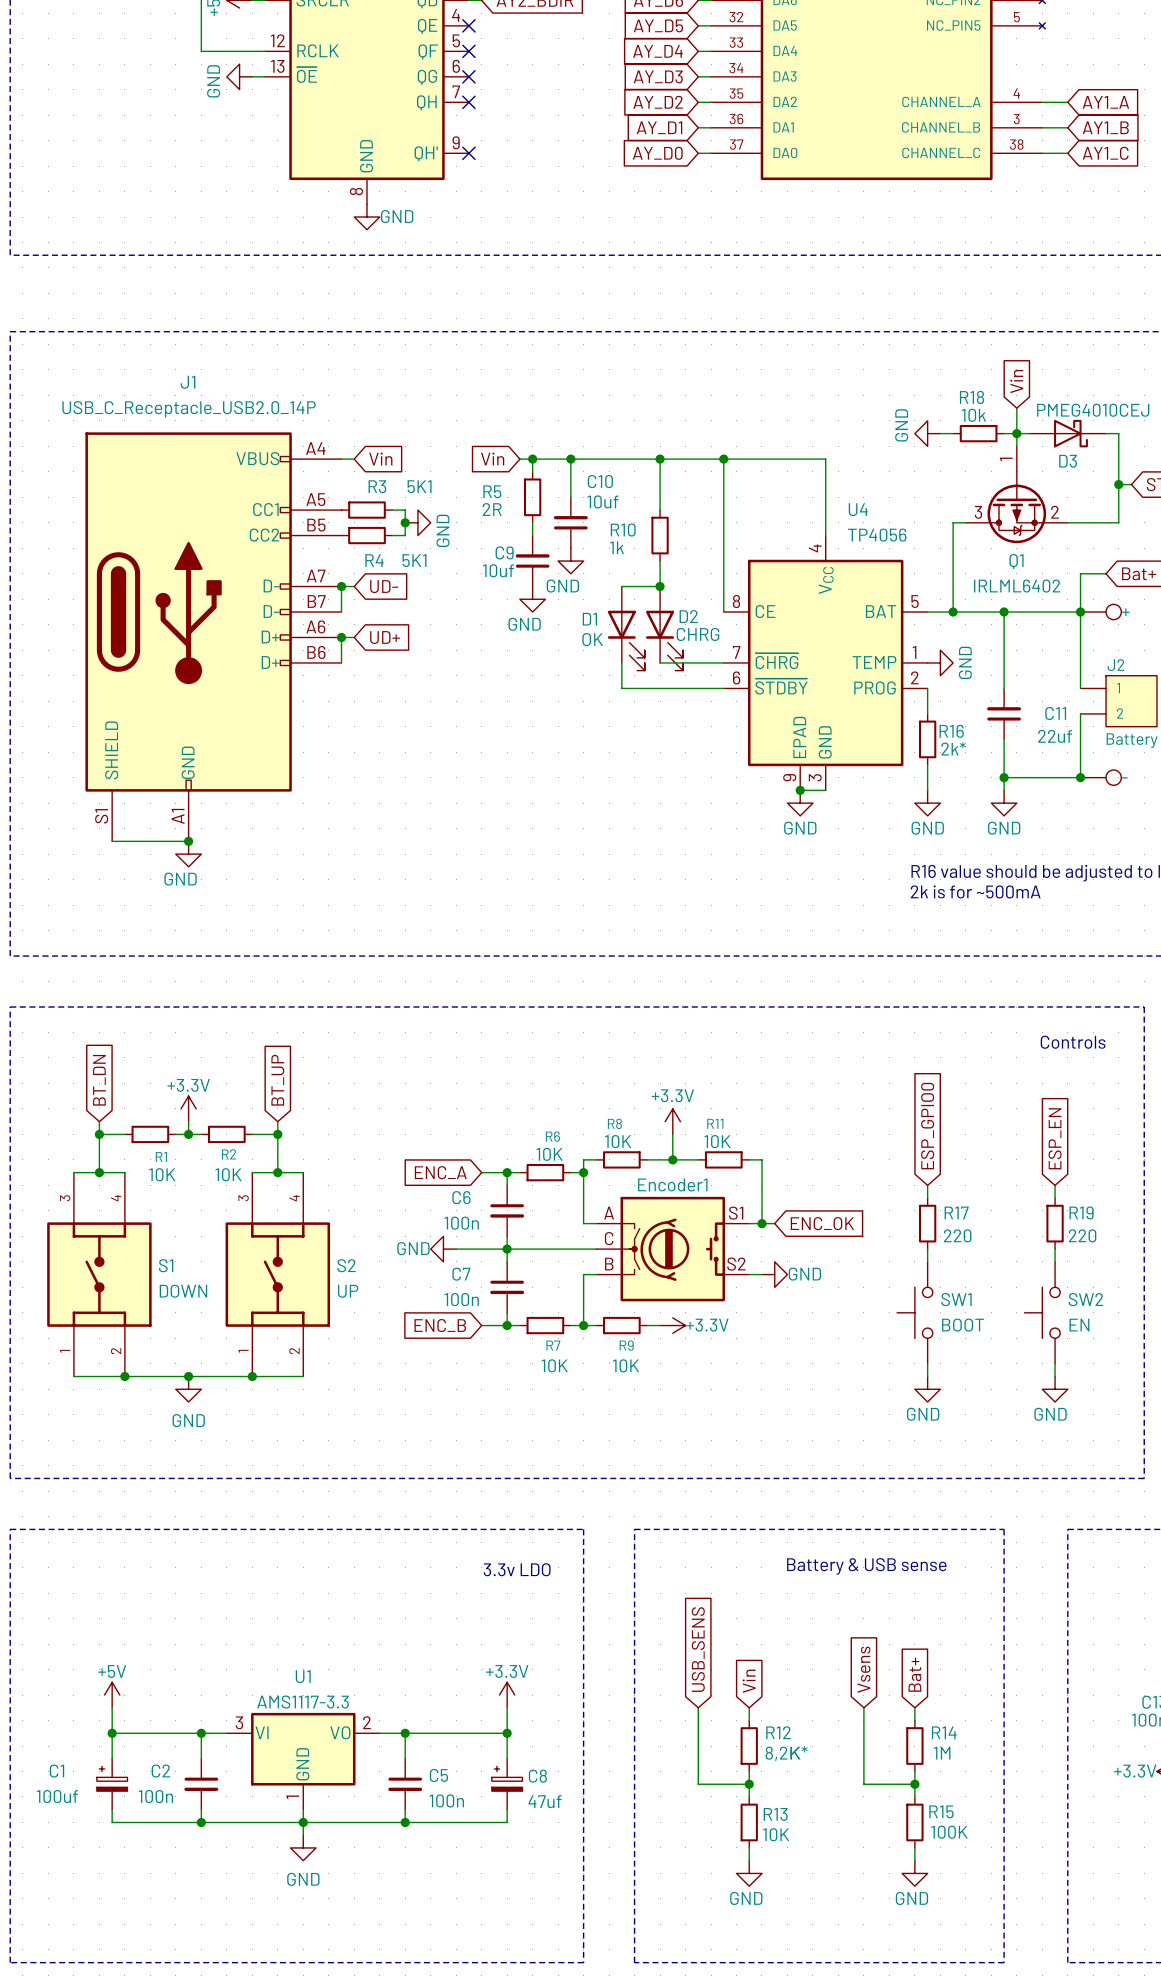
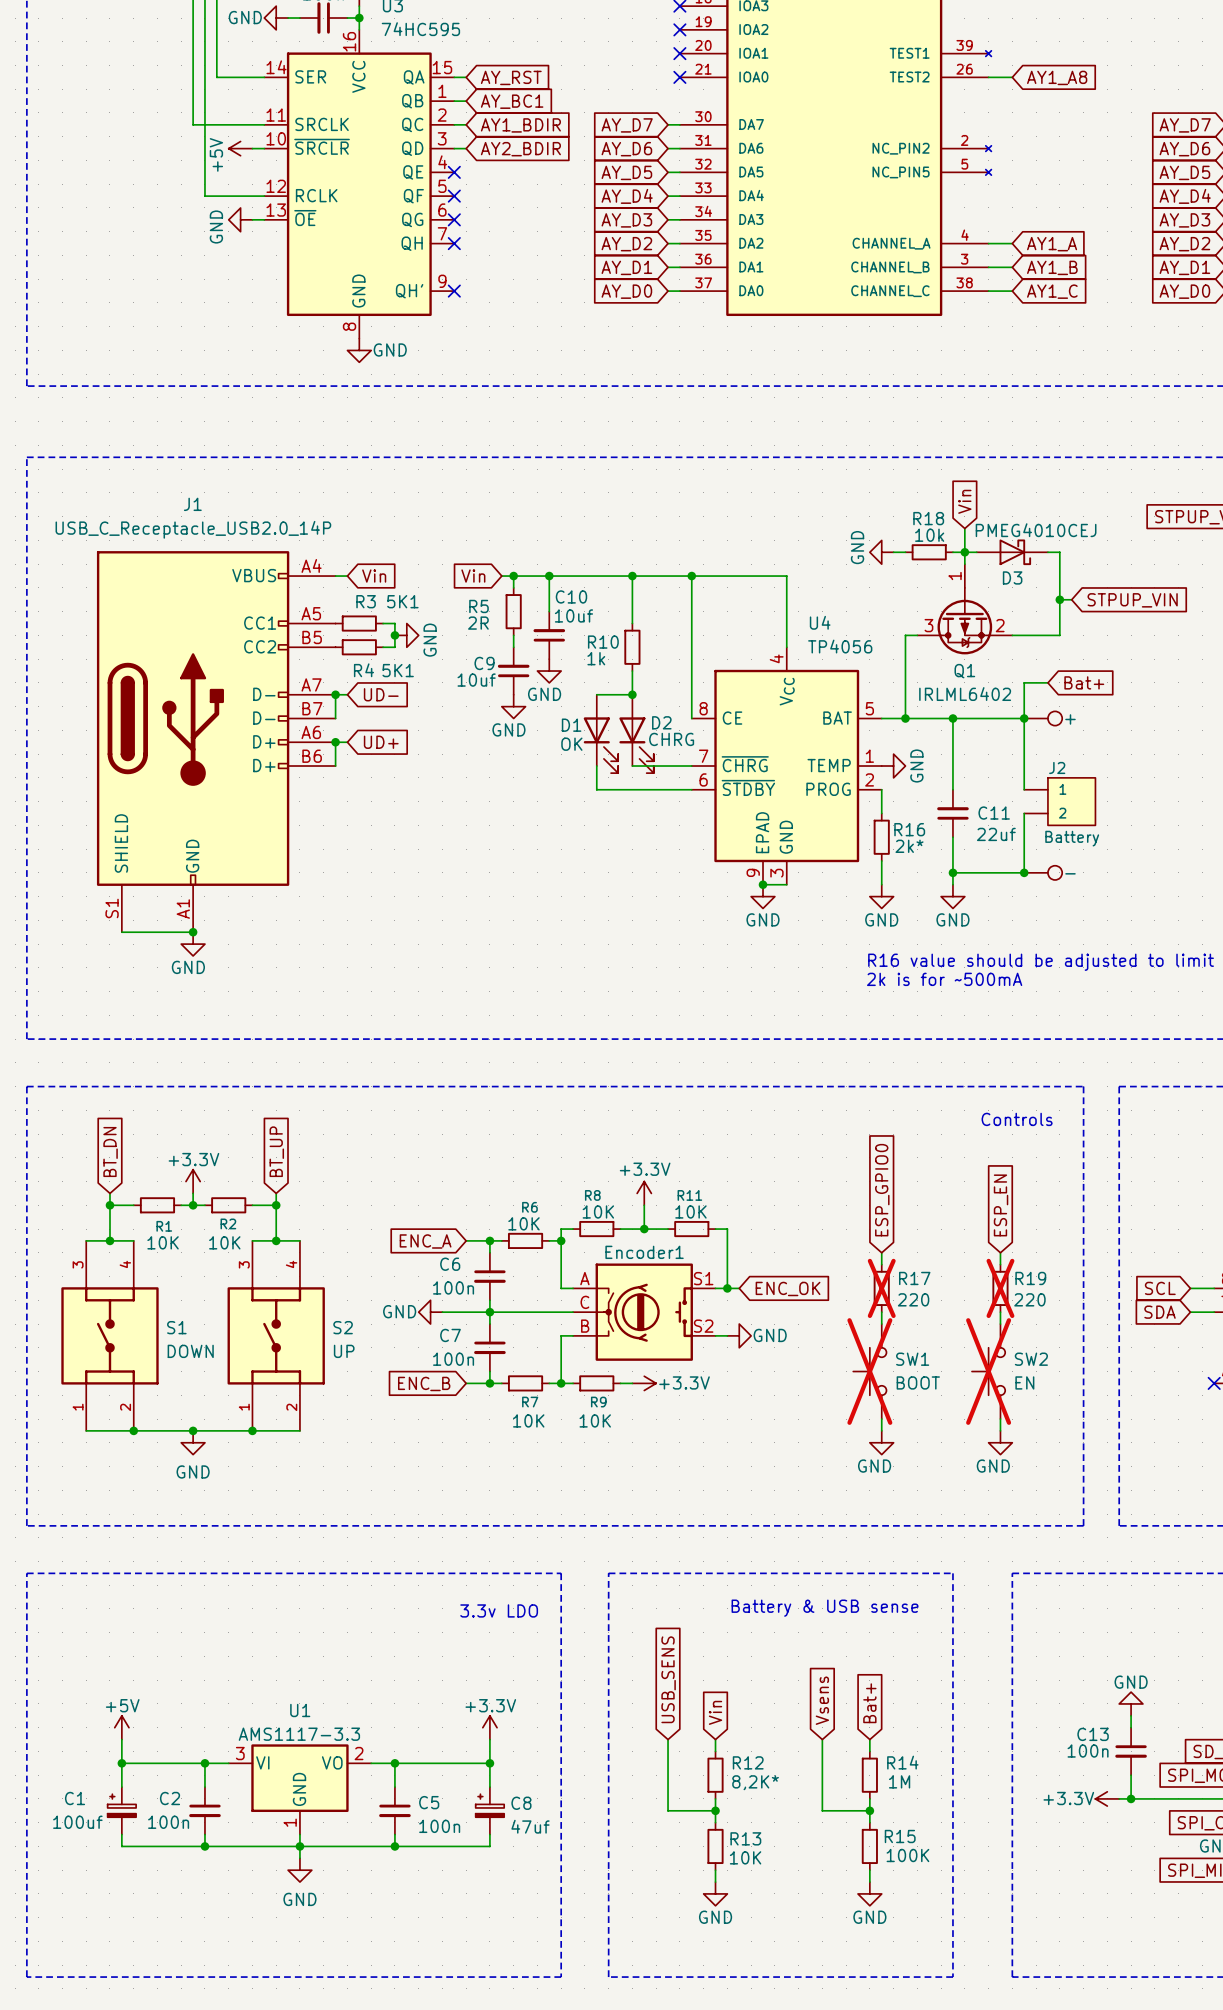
R17 do-not-place cross: none -> (881, 1288)
R19 do-not-place cross: none -> (1000, 1288)
SW1 do-not-place cross: none -> (869, 1371)
SW2 do-not-place cross: none -> (988, 1371)

